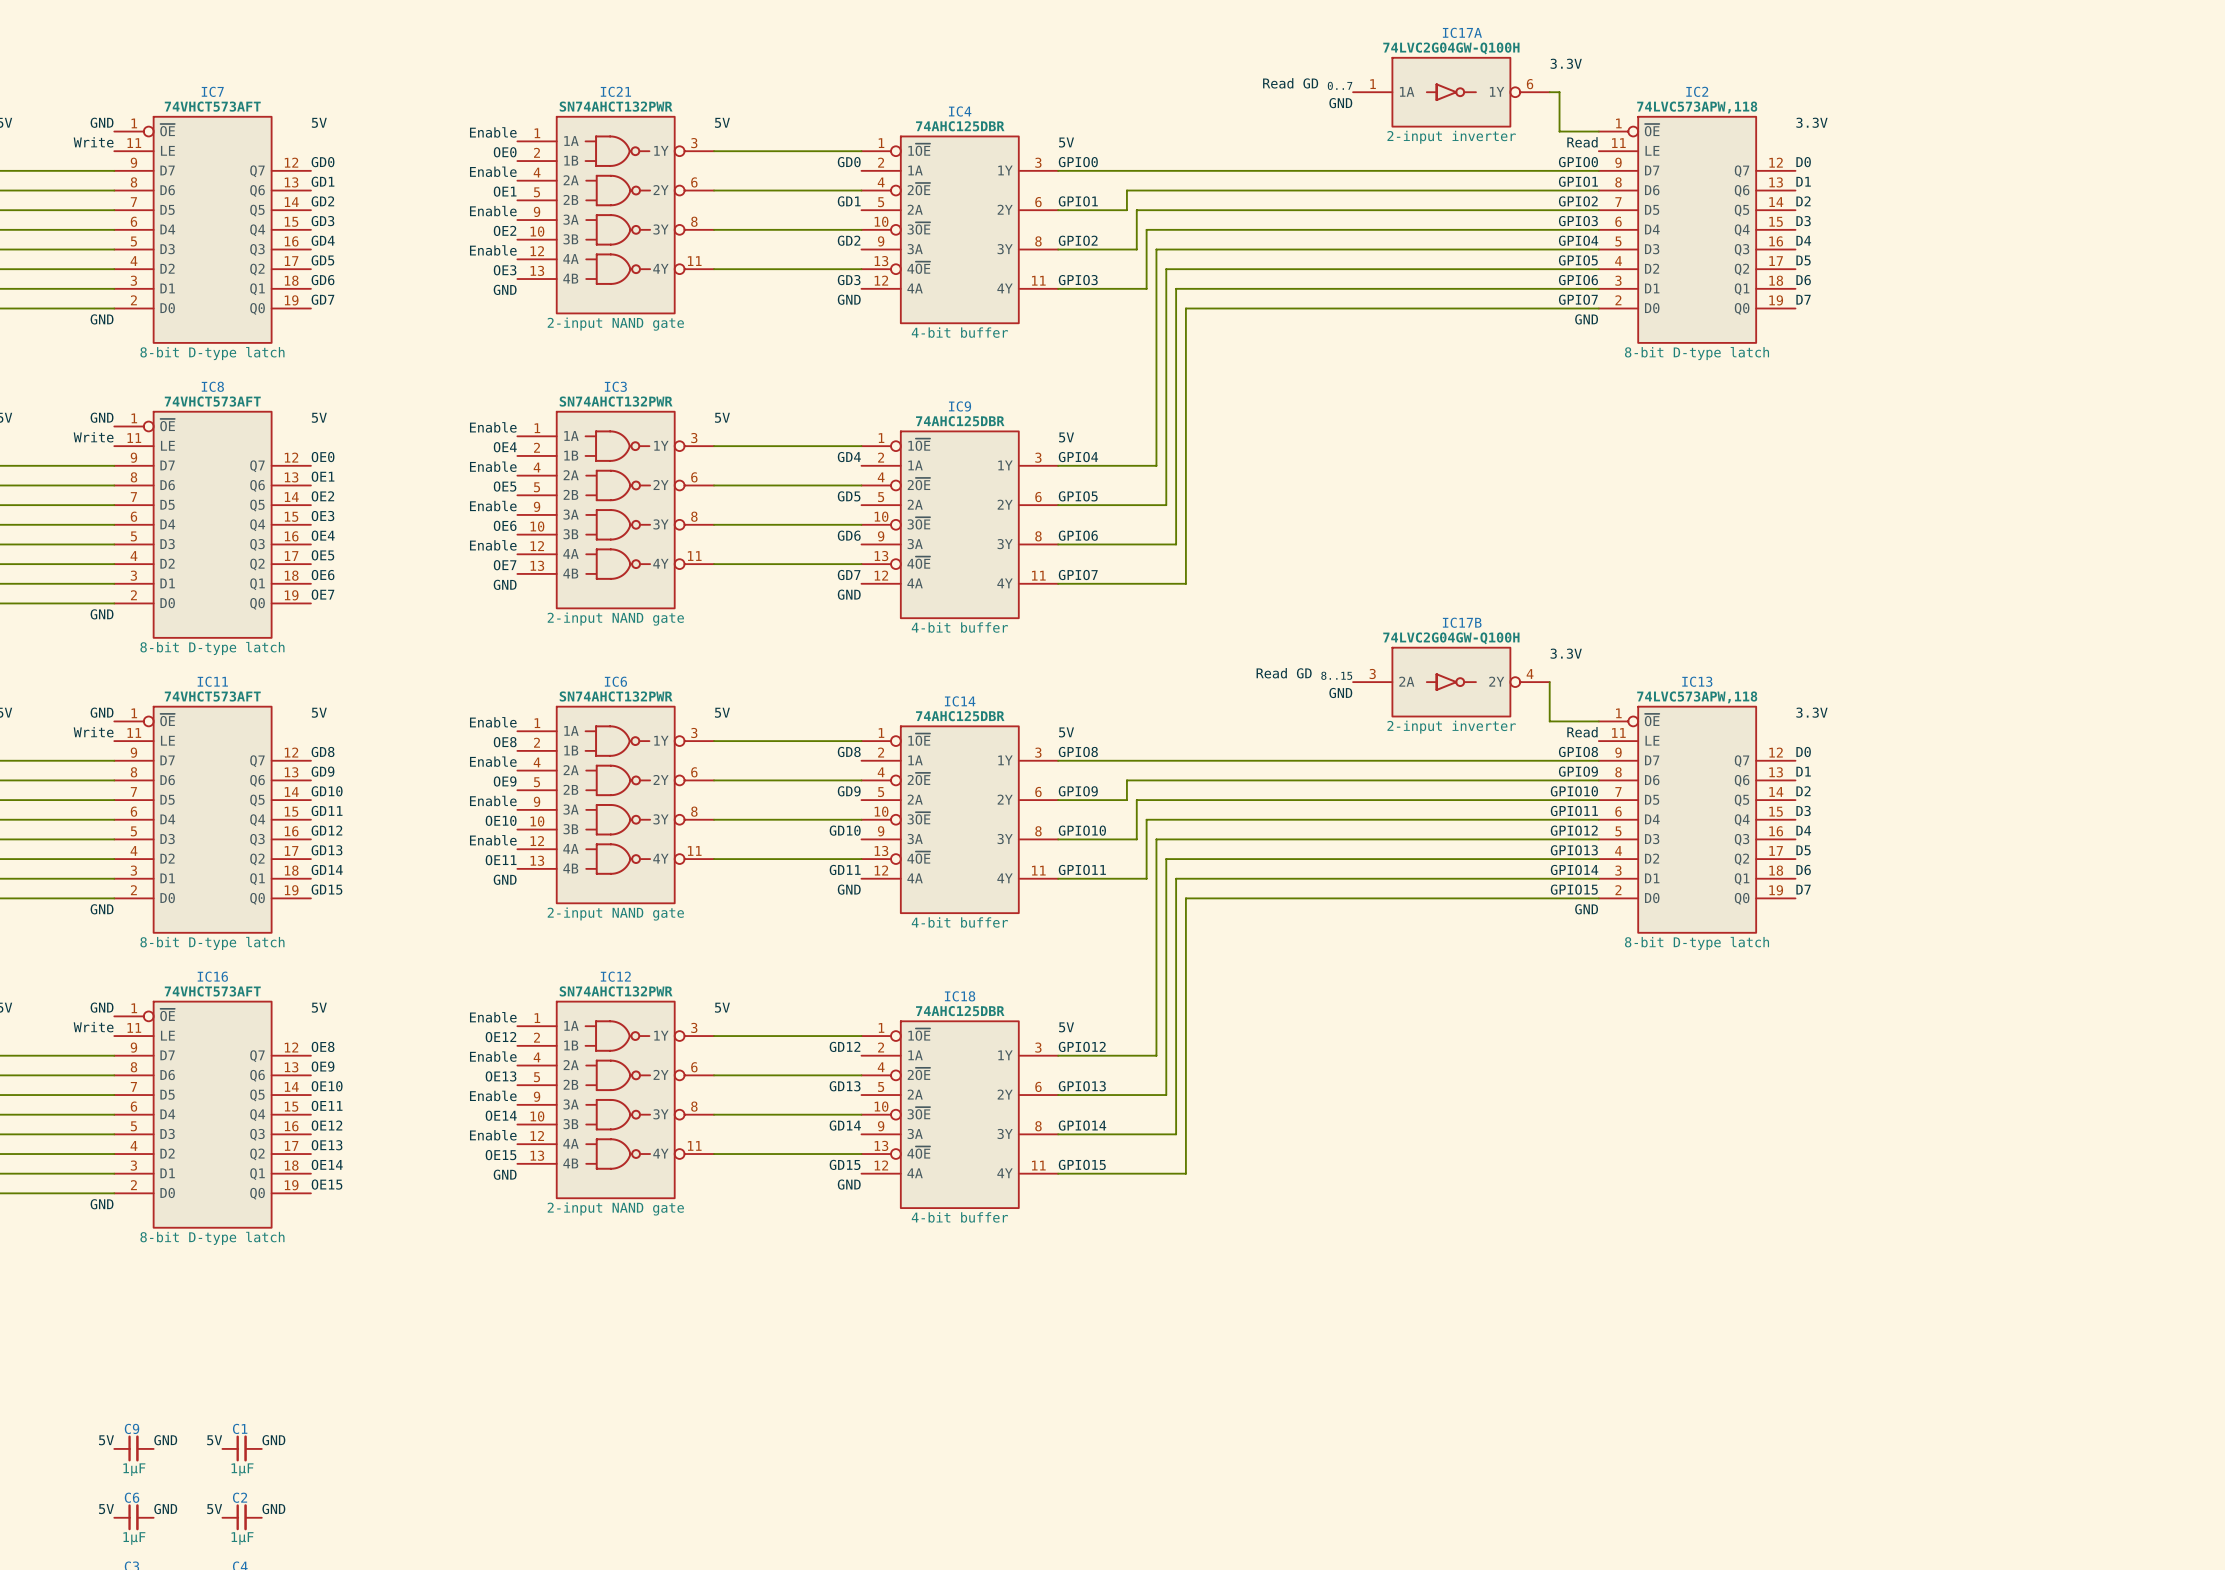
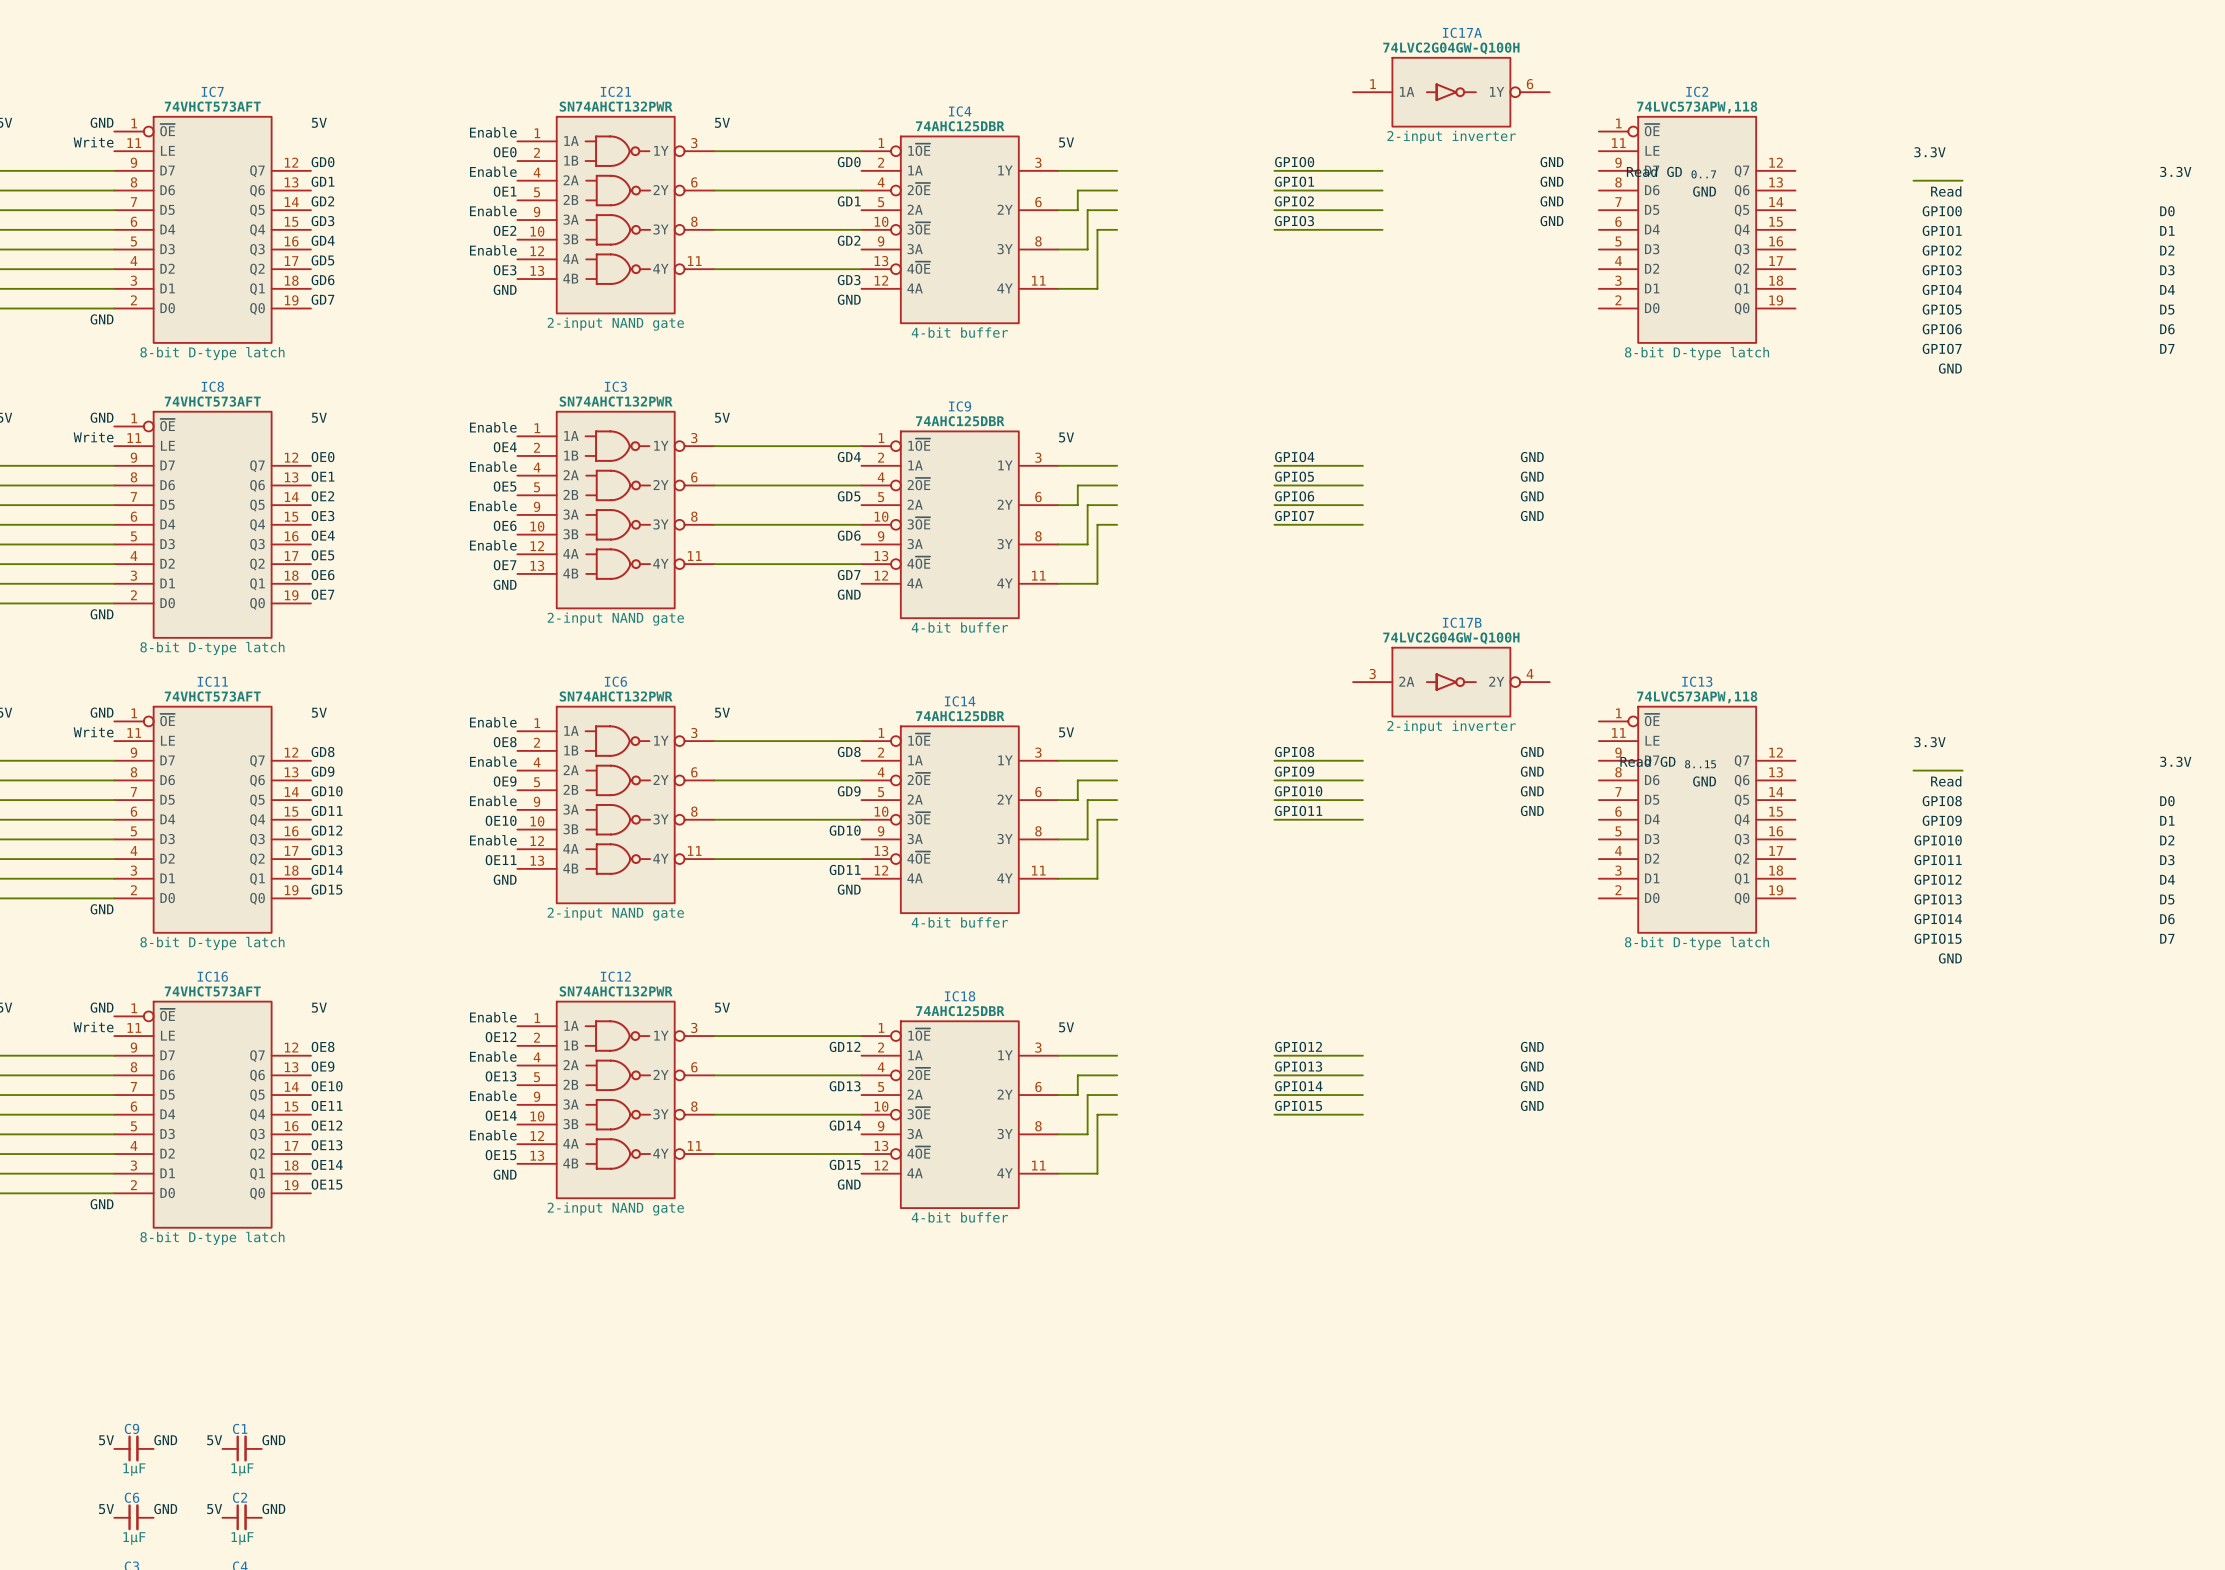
label: 3.3V (1566, 63) -> none
label: Read GD 0..7 (1307, 84) -> none
wire: (1549, 92) (1559, 92) (1559, 131) (1598, 131) -> none
label: GND (1340, 103) -> none
label position: 3.3V (1811, 122) -> 3.3V (1929, 152)
label: Read (1582, 142) -> none
label: GPIO0 (1078, 162) -> none
label: none -> GPIO0 (1294, 162)
label: none -> GND (1551, 162)
label: GPIO0 (1578, 162) -> none
label: D0 (1803, 162) -> none
wire: (1117, 170) (1274, 170) -> none
wire: (1382, 170) (1598, 170) -> none
label: none -> 3.3V (2175, 171)
label: none -> Read GD 0..7 (1671, 172)
wire: none -> (1913, 180) (1962, 180)
label: none -> GPIO1 (1294, 181)
label: none -> GND (1551, 181)
label: GPIO1 (1578, 181) -> none
label: D1 (1803, 181) -> none
wire: (1274, 190) (1126, 190) (1126, 210) (1117, 210) -> none
wire: (1382, 190) (1598, 190) -> none
label: none -> GND (1704, 191)
label: none -> Read (1946, 191)
label: GPIO1 (1078, 201) -> none
label: none -> GPIO2 (1294, 201)
label: none -> GND (1551, 201)
label: GPIO2 (1578, 201) -> none
label: D2 (1803, 201) -> none
wire: (1077, 210) (1087, 210) -> (1077, 210) (1077, 190) (1117, 190)
wire: (1274, 210) (1136, 210) (1136, 249) (1087, 249) -> (1087, 210) (1087, 249)
wire: (1382, 210) (1598, 210) -> none
label: none -> GPIO0 (1942, 211)
label: none -> D0 (2167, 211)
label: none -> GPIO3 (1294, 221)
label: none -> GND (1551, 221)
label: GPIO3 (1578, 221) -> none
label: D3 (1803, 221) -> none
wire: (1274, 229) (1146, 229) (1146, 288) (1097, 288) -> (1117, 229) (1097, 229) (1097, 288)
wire: (1382, 229) (1598, 229) -> none
label: none -> GPIO1 (1942, 230)
label: none -> D1 (2167, 230)
label: GPIO2 (1078, 240) -> none
label: GPIO4 (1578, 240) -> none
label: D4 (1803, 240) -> none
wire: (1598, 249) (1156, 249) (1156, 465) (1117, 465) -> none
label: none -> GPIO2 (1942, 250)
label: none -> D2 (2167, 250)
label: GPIO5 (1578, 260) -> none
label: D5 (1803, 260) -> none
wire: (1598, 269) (1166, 269) (1166, 505) (1117, 505) -> none
label: none -> GPIO3 (1942, 270)
label: none -> D3 (2167, 270)
label: GPIO3 (1078, 280) -> none
label: GPIO6 (1578, 280) -> none
label: D6 (1803, 280) -> none
wire: (1598, 288) (1176, 288) (1176, 544) (1087, 544) -> (1087, 505) (1087, 544)
label: none -> GPIO4 (1942, 289)
label: none -> D4 (2167, 289)
label: GPIO7 (1578, 299) -> none
label: D7 (1803, 299) -> none
wire: (1598, 308) (1185, 308) (1185, 583) (1097, 583) -> (1117, 524) (1097, 524) (1097, 583)
label: none -> GPIO5 (1942, 309)
label: none -> D5 (2167, 309)
label: GND (1586, 319) -> none
label: none -> GPIO6 (1942, 329)
label: none -> D6 (2167, 329)
label: none -> GPIO7 (1942, 348)
label: none -> D7 (2167, 348)
label: none -> GND (1950, 368)
label: GPIO4 (1078, 457) -> none
label: none -> GPIO4 (1294, 457)
label: none -> GND (1532, 457)
wire: none -> (1274, 465) (1362, 465)
label: none -> GPIO5 (1294, 476)
label: none -> GND (1532, 476)
wire: none -> (1274, 485) (1362, 485)
label: GPIO5 (1078, 496) -> none
label: none -> GPIO6 (1294, 496)
label: none -> GND (1532, 496)
wire: (1077, 505) (1087, 505) -> (1077, 505) (1077, 485) (1117, 485)
wire: none -> (1274, 505) (1362, 505)
label: none -> GPIO7 (1294, 516)
label: none -> GND (1532, 516)
wire: none -> (1274, 524) (1362, 524)
label: GPIO6 (1078, 535) -> none
label: GPIO7 (1078, 575) -> none
label: 3.3V (1566, 653) -> none
label: Read GD 8..15 (1304, 673) -> none
wire: (1549, 682) (1549, 721) (1598, 721) -> none
label: GND (1340, 693) -> none
label position: 3.3V (1811, 712) -> 3.3V (1929, 742)
label: Read (1582, 732) -> none
label: GPIO8 (1078, 751) -> none
label: none -> GPIO8 (1294, 751)
label: none -> GND (1532, 751)
label: GPIO8 (1578, 751) -> none
label: D0 (1803, 751) -> none
wire: (1117, 760) (1274, 760) -> none
wire: (1362, 760) (1598, 760) -> none
label: none -> 3.3V (2175, 761)
label: none -> Read GD 8..15 (1668, 762)
wire: none -> (1913, 770) (1962, 770)
label: none -> GPIO9 (1294, 771)
label: none -> GND (1532, 771)
label: GPIO9 (1578, 771) -> none
label: D1 (1803, 771) -> none
wire: (1274, 780) (1126, 780) (1126, 800) (1117, 800) -> none
wire: (1362, 780) (1598, 780) -> none
label: none -> GND (1704, 781)
label: none -> Read (1946, 781)
label: GPIO9 (1078, 791) -> none
label: none -> GPIO10 (1298, 791)
label: none -> GND (1532, 791)
label: GPIO10 (1574, 791) -> none
label: D2 (1803, 791) -> none
wire: (1077, 800) (1087, 800) -> (1077, 800) (1077, 780) (1117, 780)
wire: (1274, 800) (1136, 800) (1136, 839) (1087, 839) -> (1087, 800) (1087, 839)
wire: (1362, 800) (1598, 800) -> none
label: none -> GPIO8 (1942, 801)
label: none -> D0 (2167, 801)
label: none -> GPIO11 (1298, 810)
label: none -> GND (1532, 810)
label: GPIO11 (1574, 810) -> none
label: D3 (1803, 810) -> none
wire: (1274, 819) (1146, 819) (1146, 878) (1097, 878) -> (1117, 819) (1097, 819) (1097, 878)
wire: (1362, 819) (1598, 819) -> none
label: none -> GPIO9 (1942, 820)
label: none -> D1 (2167, 820)
label: GPIO10 (1082, 830) -> none
label: GPIO12 (1574, 830) -> none
label: D4 (1803, 830) -> none
wire: (1598, 839) (1156, 839) (1156, 1055) (1117, 1055) -> none
label: none -> GPIO10 (1938, 840)
label: none -> D2 (2167, 840)
label: GPIO13 (1574, 850) -> none
label: D5 (1803, 850) -> none
wire: (1598, 859) (1166, 859) (1166, 1095) (1117, 1095) -> none
label: none -> GPIO11 (1938, 860)
label: none -> D3 (2167, 860)
label: GPIO11 (1082, 869) -> none
label: GPIO14 (1574, 869) -> none
label: D6 (1803, 869) -> none
wire: (1598, 878) (1176, 878) (1176, 1134) (1087, 1134) -> (1087, 1095) (1087, 1134)
label: none -> GPIO12 (1938, 879)
label: none -> D4 (2167, 879)
label: GPIO15 (1574, 889) -> none
label: D7 (1803, 889) -> none
wire: (1598, 898) (1185, 898) (1185, 1173) (1097, 1173) -> (1117, 1114) (1097, 1114) (1097, 1173)
label: none -> GPIO13 (1938, 899)
label: none -> D5 (2167, 899)
label: GND (1586, 909) -> none
label: none -> GPIO14 (1938, 919)
label: none -> D6 (2167, 919)
label: none -> GPIO15 (1938, 938)
label: none -> D7 (2167, 938)
label: none -> GND (1950, 958)
label: GPIO12 (1082, 1046) -> none
label: none -> GPIO12 (1298, 1046)
label: none -> GND (1532, 1046)
wire: none -> (1274, 1055) (1362, 1055)
label: none -> GPIO13 (1298, 1066)
label: none -> GND (1532, 1066)
wire: none -> (1274, 1075) (1362, 1075)
label: GPIO13 (1082, 1086) -> none
label: none -> GPIO14 (1298, 1086)
label: none -> GND (1532, 1086)
wire: (1077, 1095) (1087, 1095) -> (1077, 1095) (1077, 1075) (1117, 1075)
wire: none -> (1274, 1095) (1362, 1095)
label: none -> GPIO15 (1298, 1105)
label: none -> GND (1532, 1105)
wire: none -> (1274, 1114) (1362, 1114)
label: GPIO14 (1082, 1125) -> none
label: GPIO15 (1082, 1164) -> none

